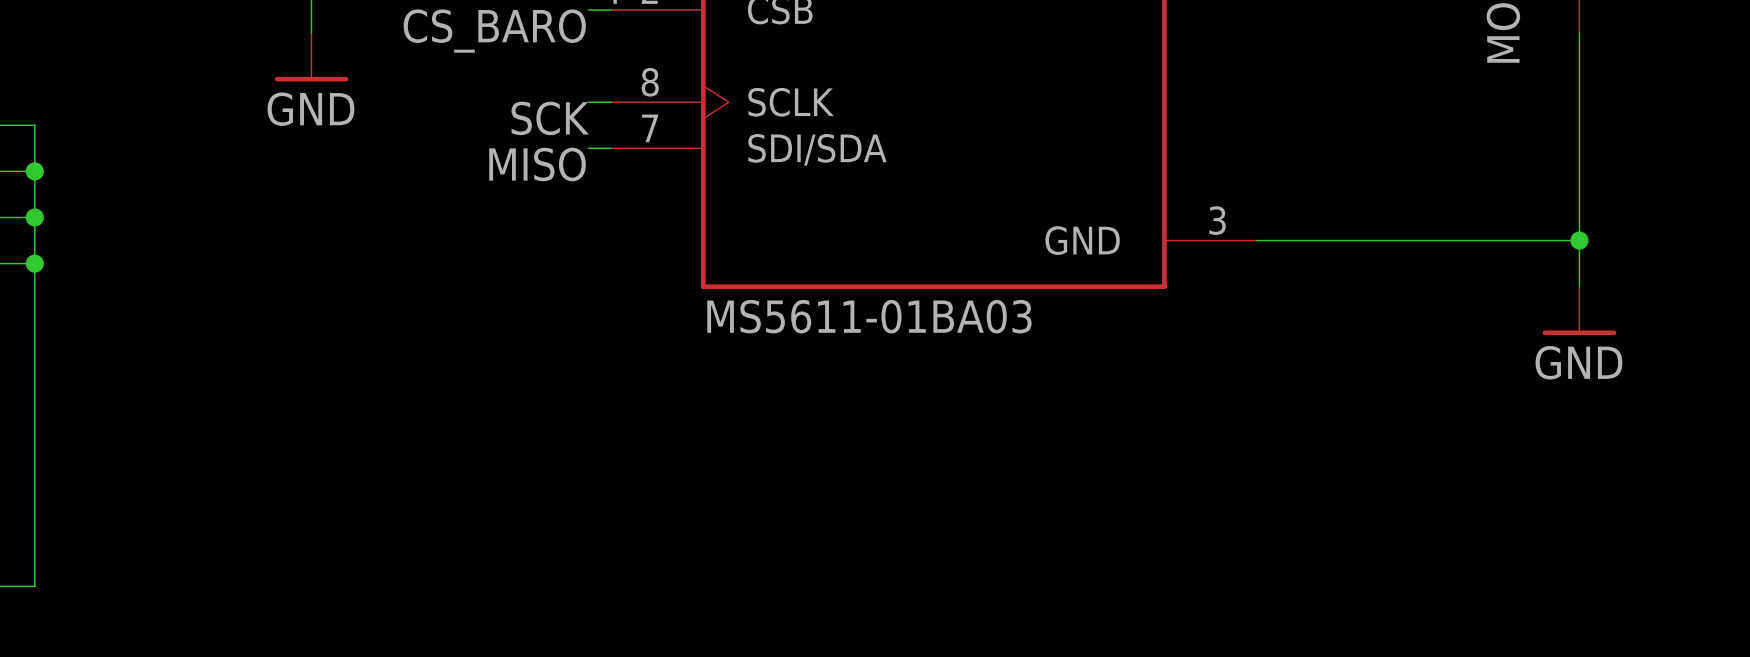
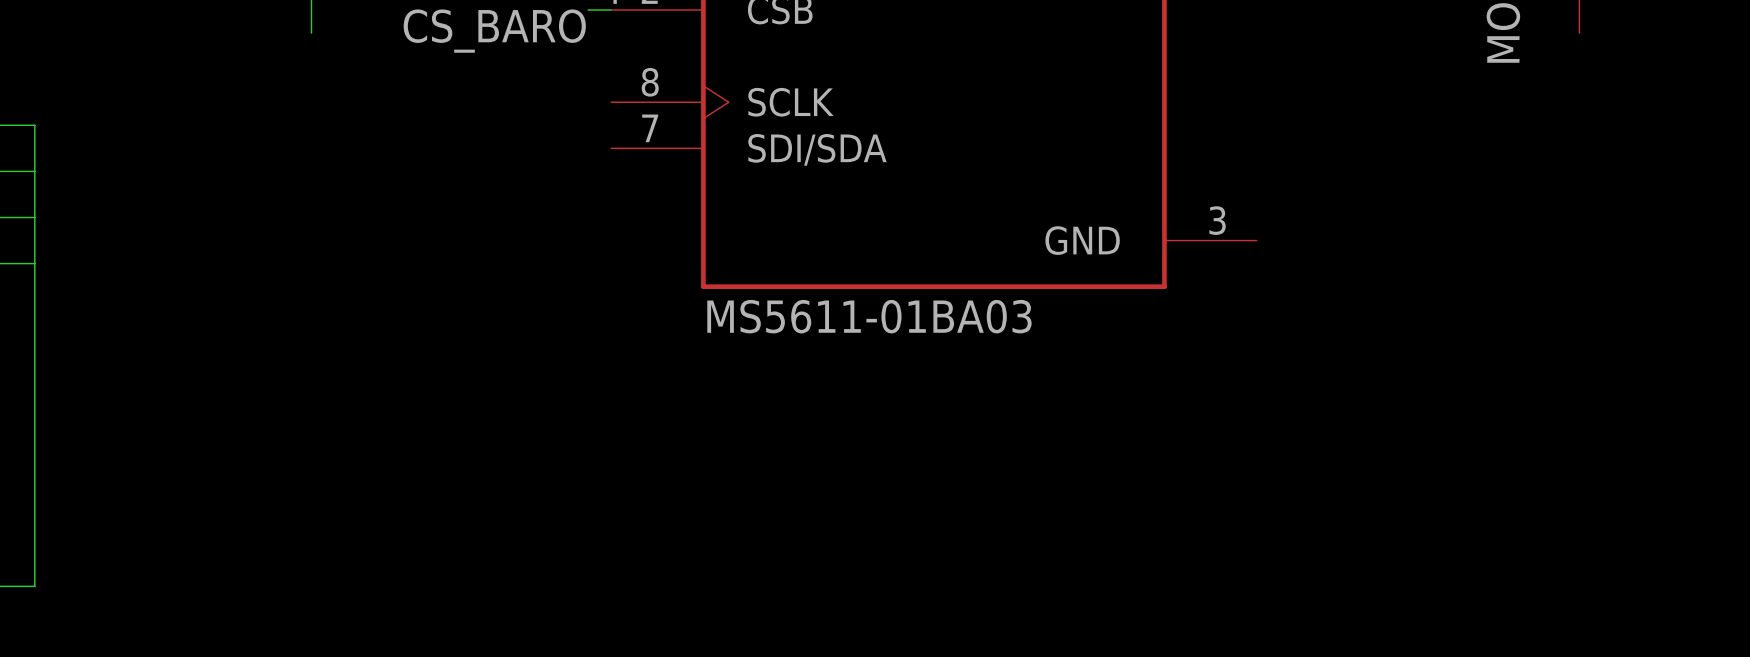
wire: (1579, 33) (1579, 286) -> none
power symbol: GND (311, 57) -> none
wire: (588, 102) (611, 102) -> none
label: SCK (550, 118) -> none
wire: (588, 148) (611, 148) -> none
label: MISO (537, 164) -> none
junction: (34, 171) -> none
junction: (34, 217) -> none
wire: (1256, 240) (1579, 240) -> none
junction: (1579, 240) -> none
junction: (34, 263) -> none
power symbol: GND (1579, 310) -> none

